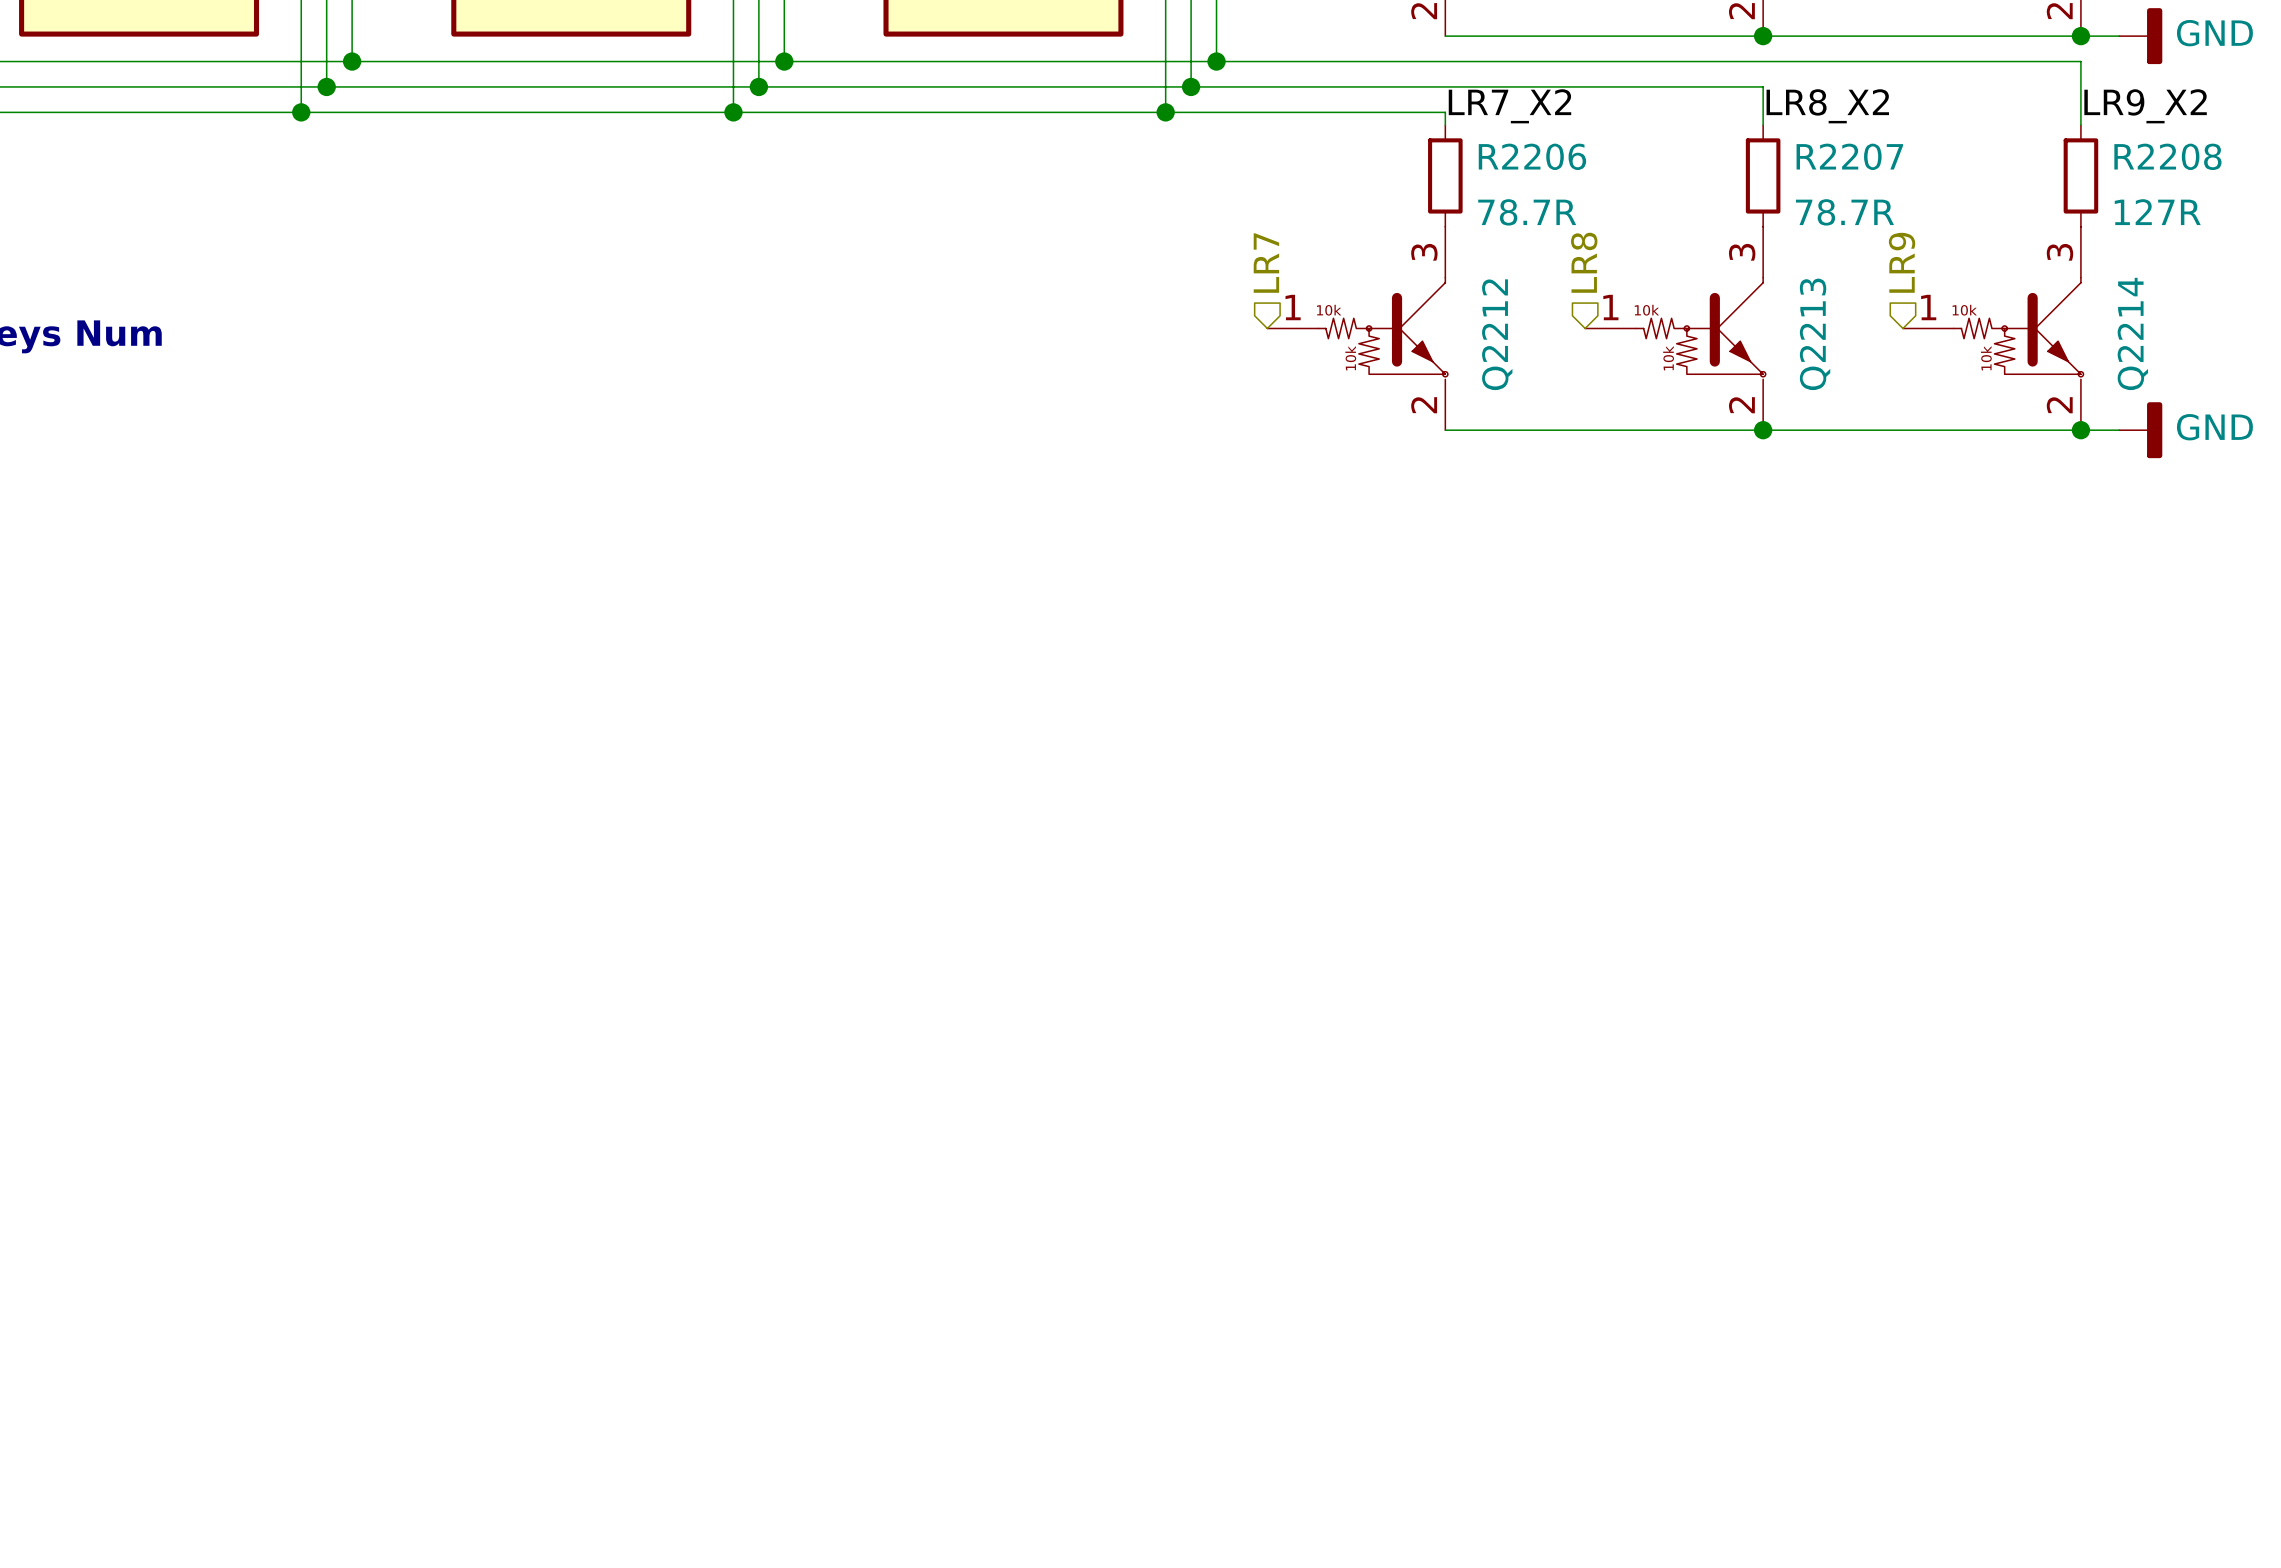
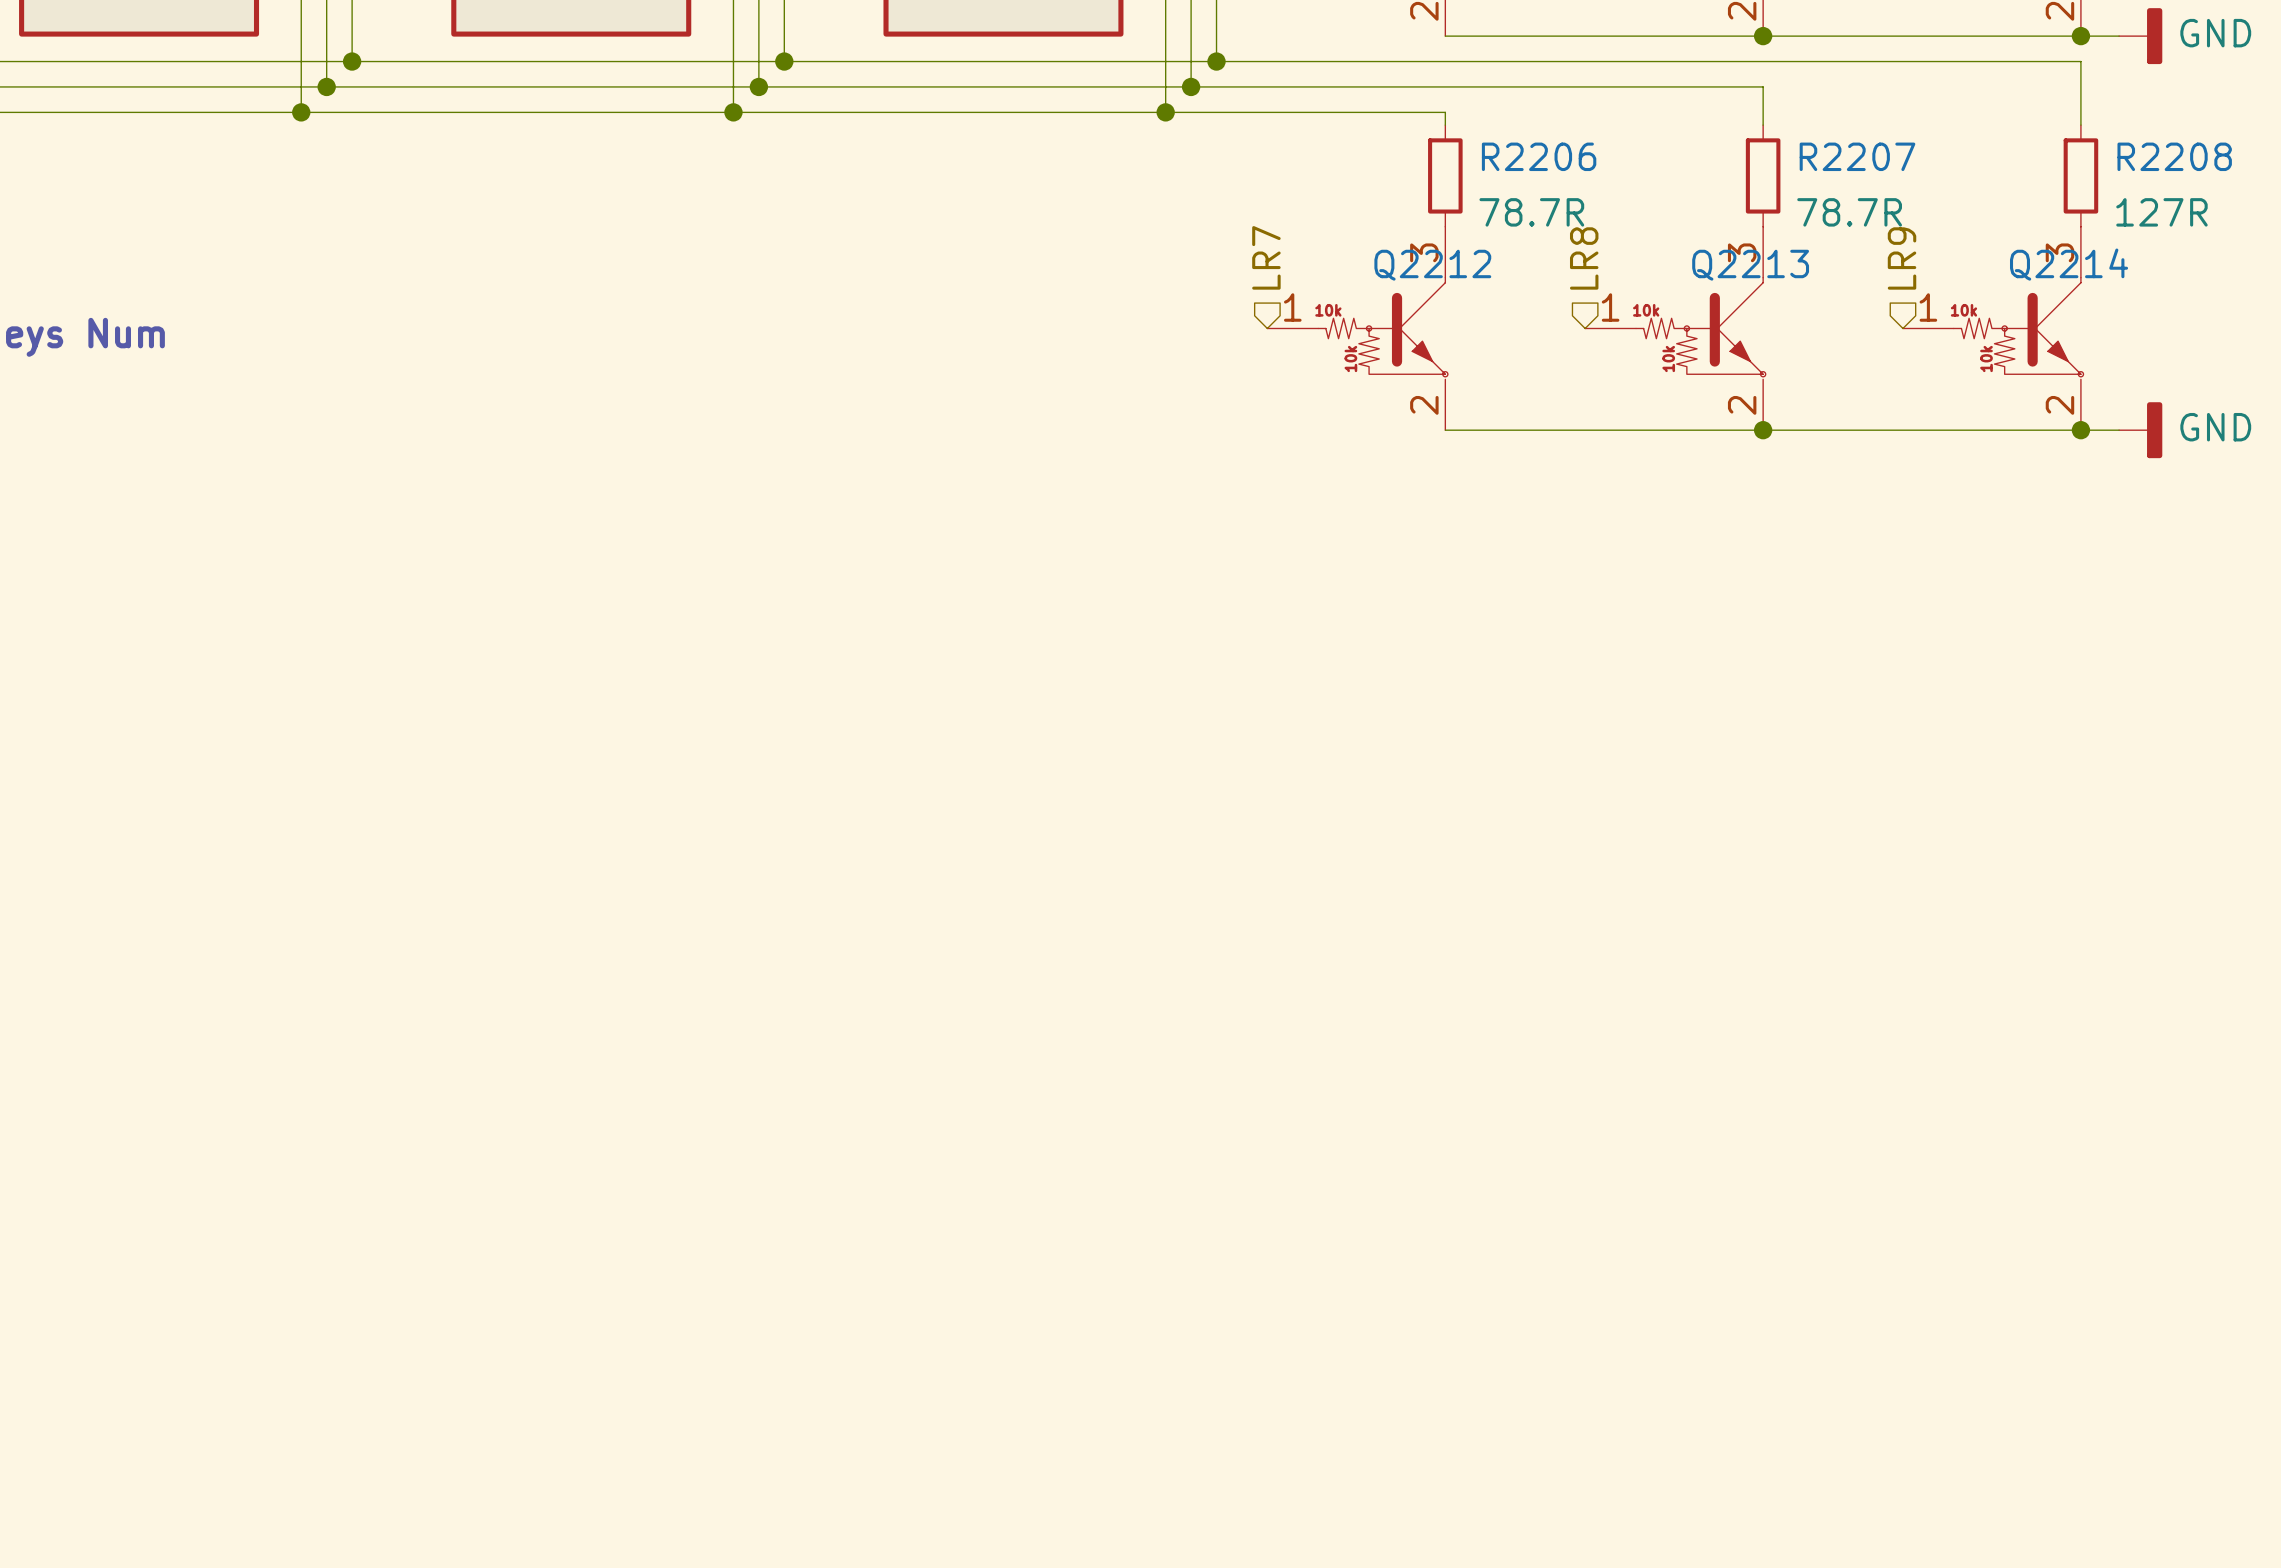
label: LR7_X2 (1509, 106) -> none
label: LR8_X2 (1827, 106) -> none
label: LR9_X2 (2145, 106) -> none
Q2214 name rotation: 0° (2132, 333) -> 90° clockwise (2069, 264)
Q2212 name rotation: 0° (1497, 334) -> 90° clockwise (1432, 265)
Q2213 name rotation: 0° (1815, 334) -> 90° clockwise (1750, 265)

